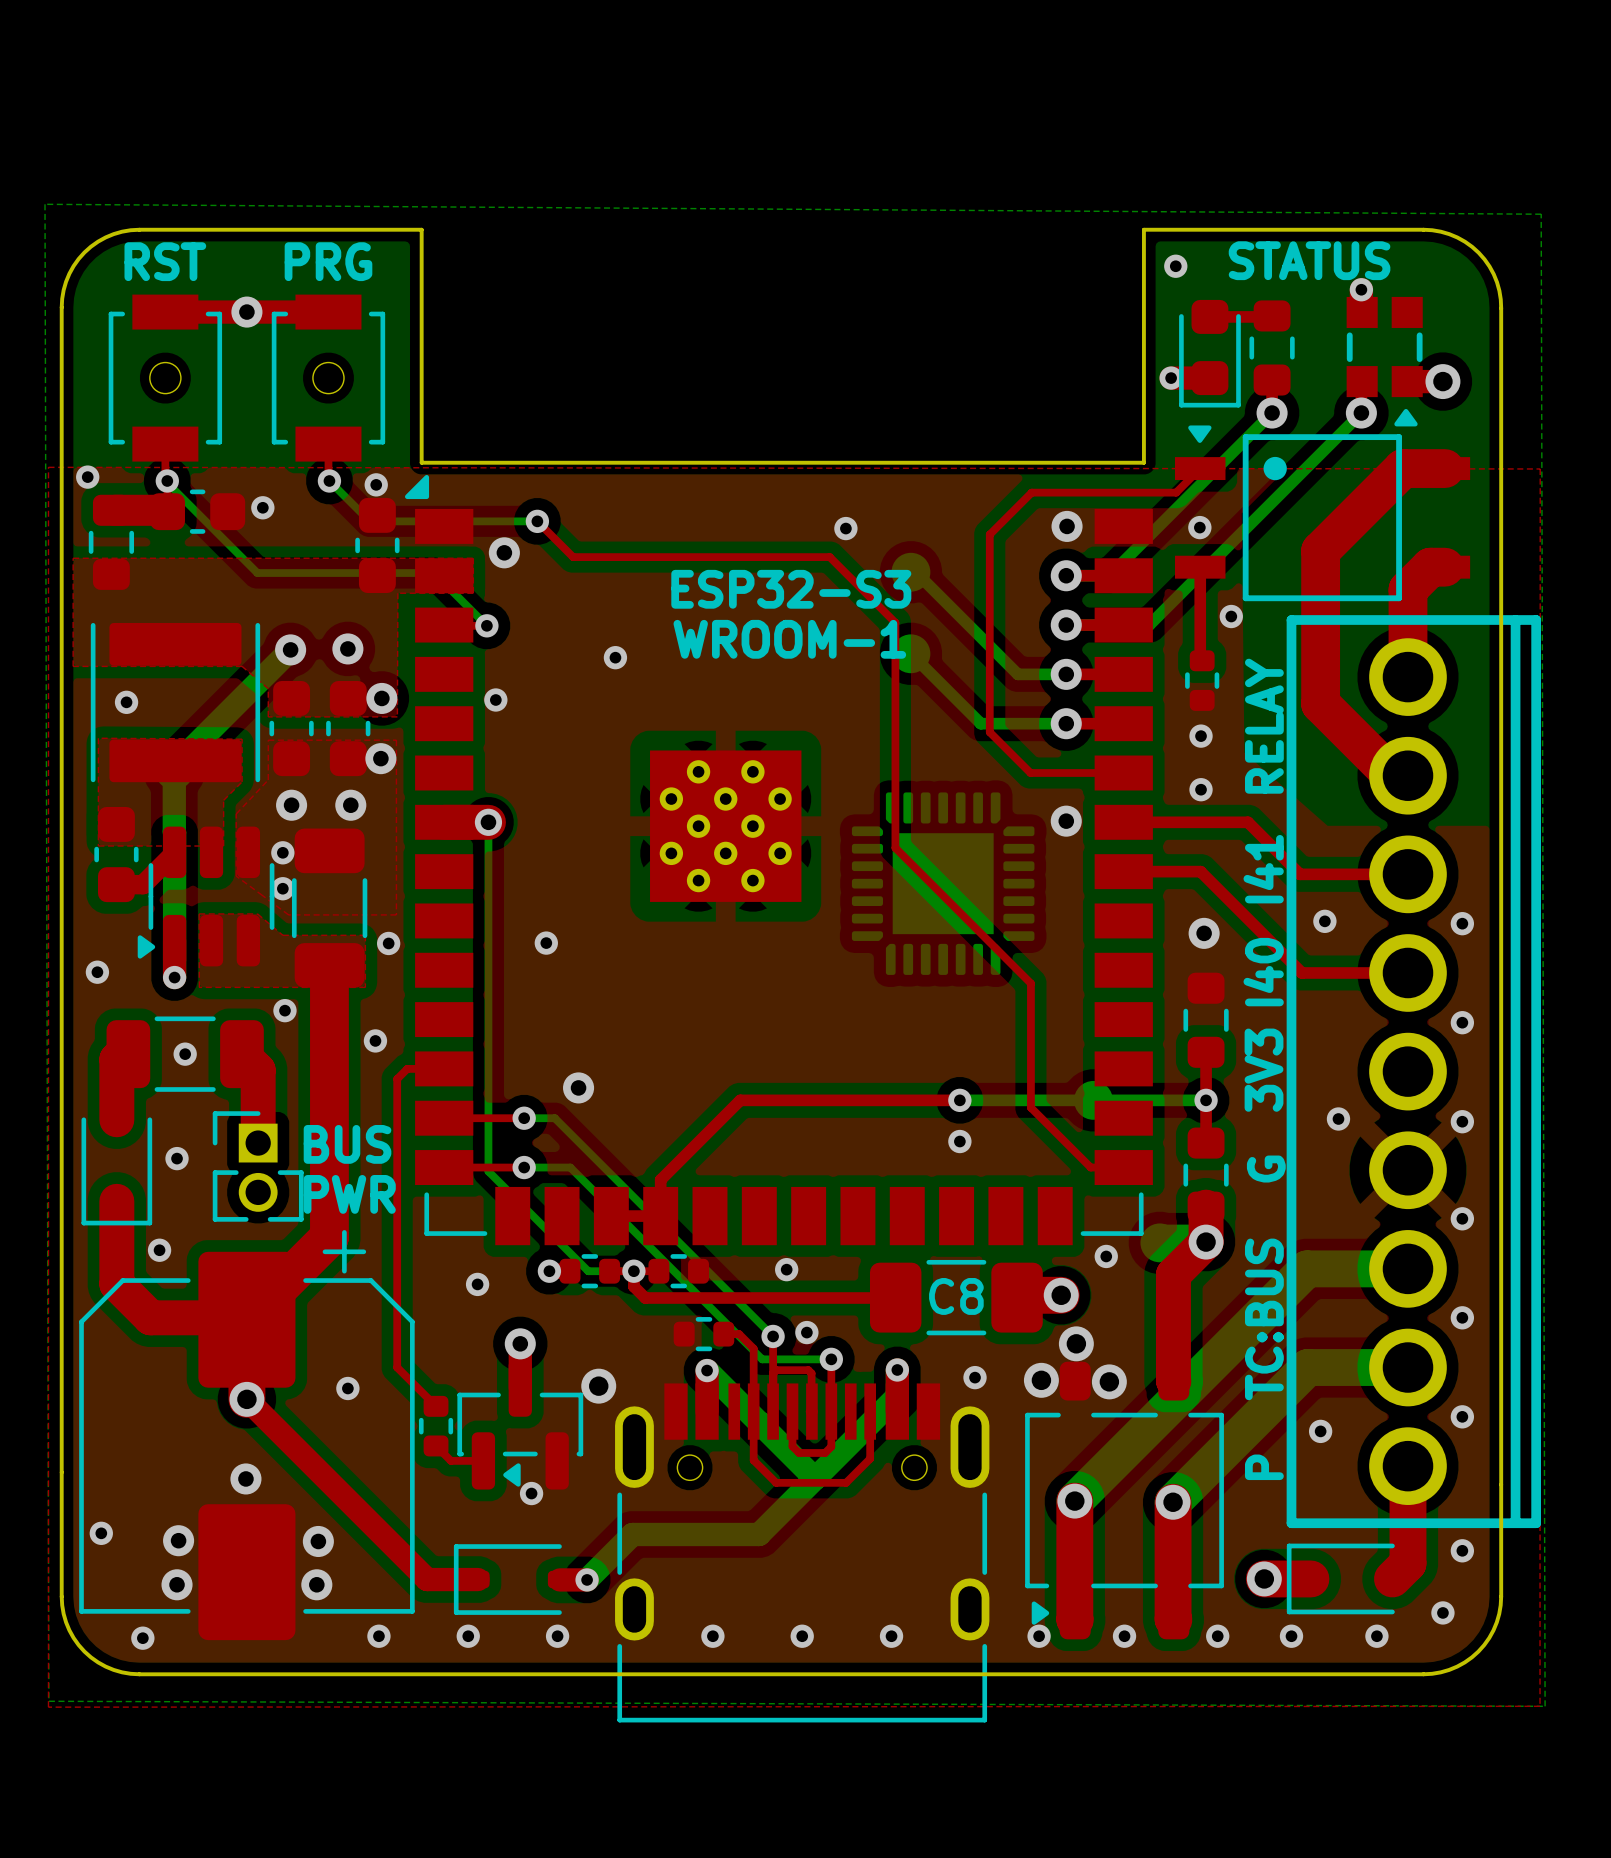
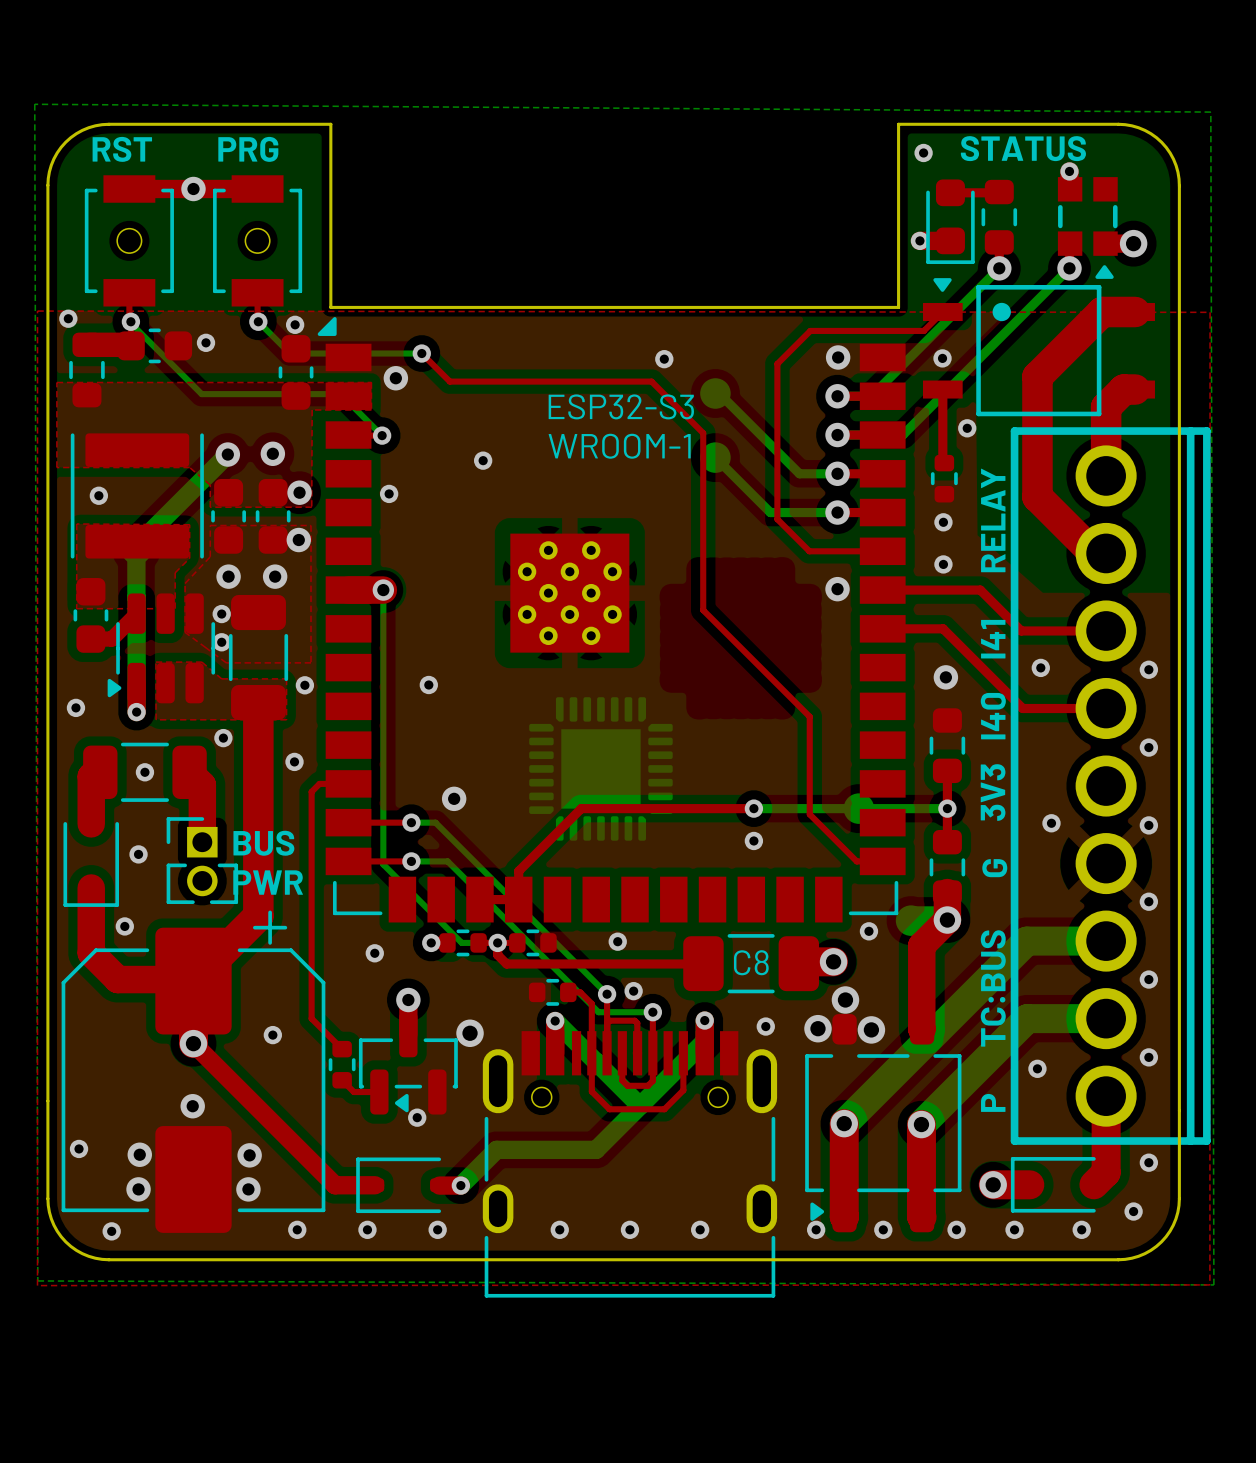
part position: (943, 883) -> (600, 768)

